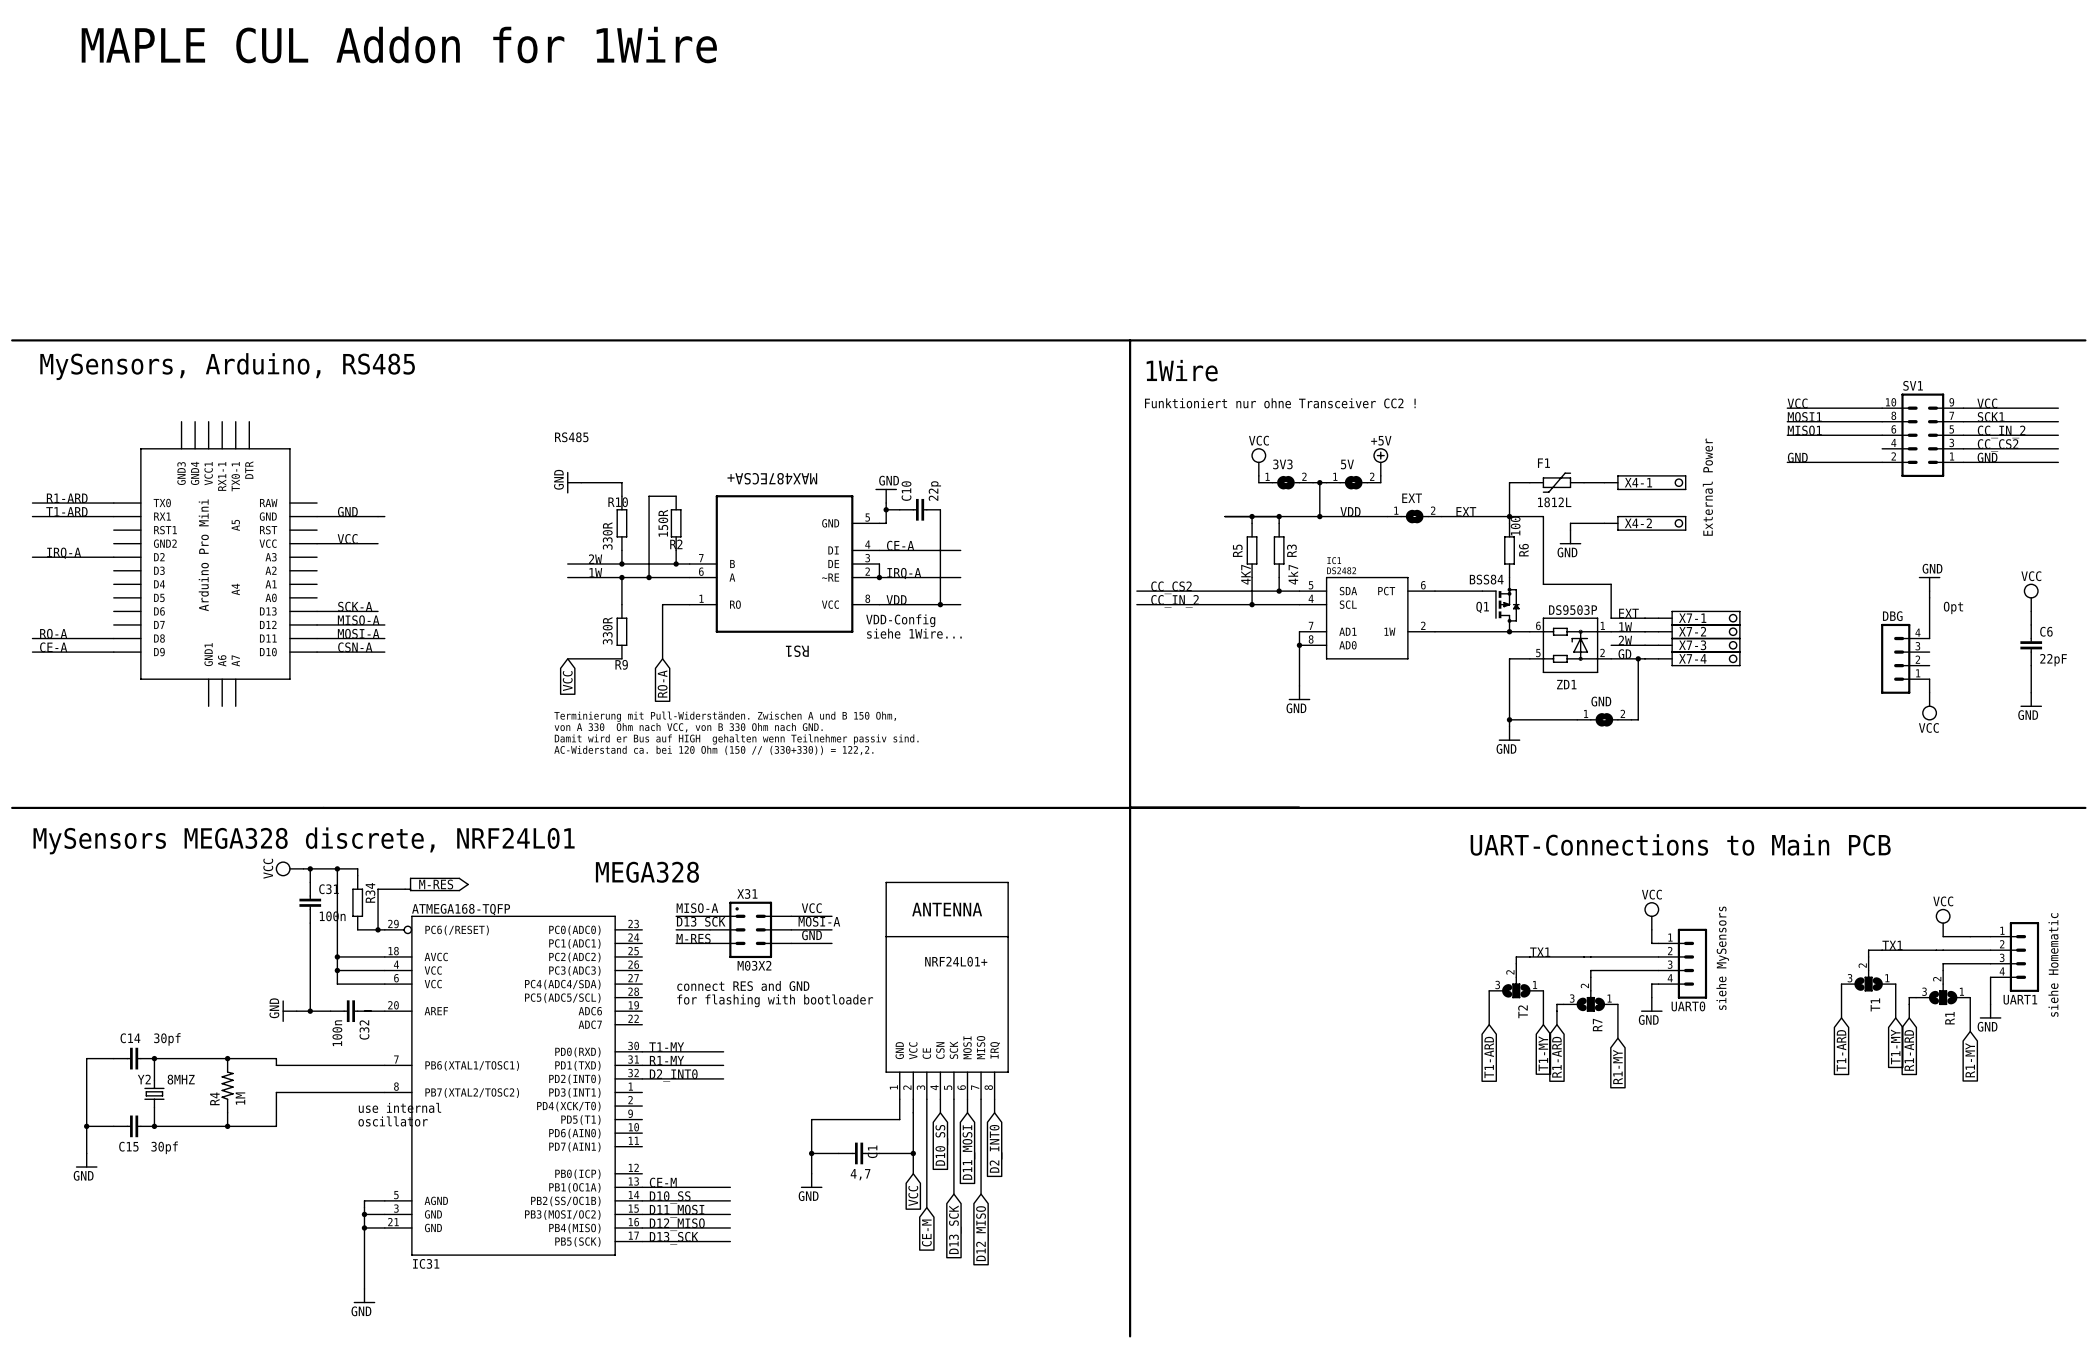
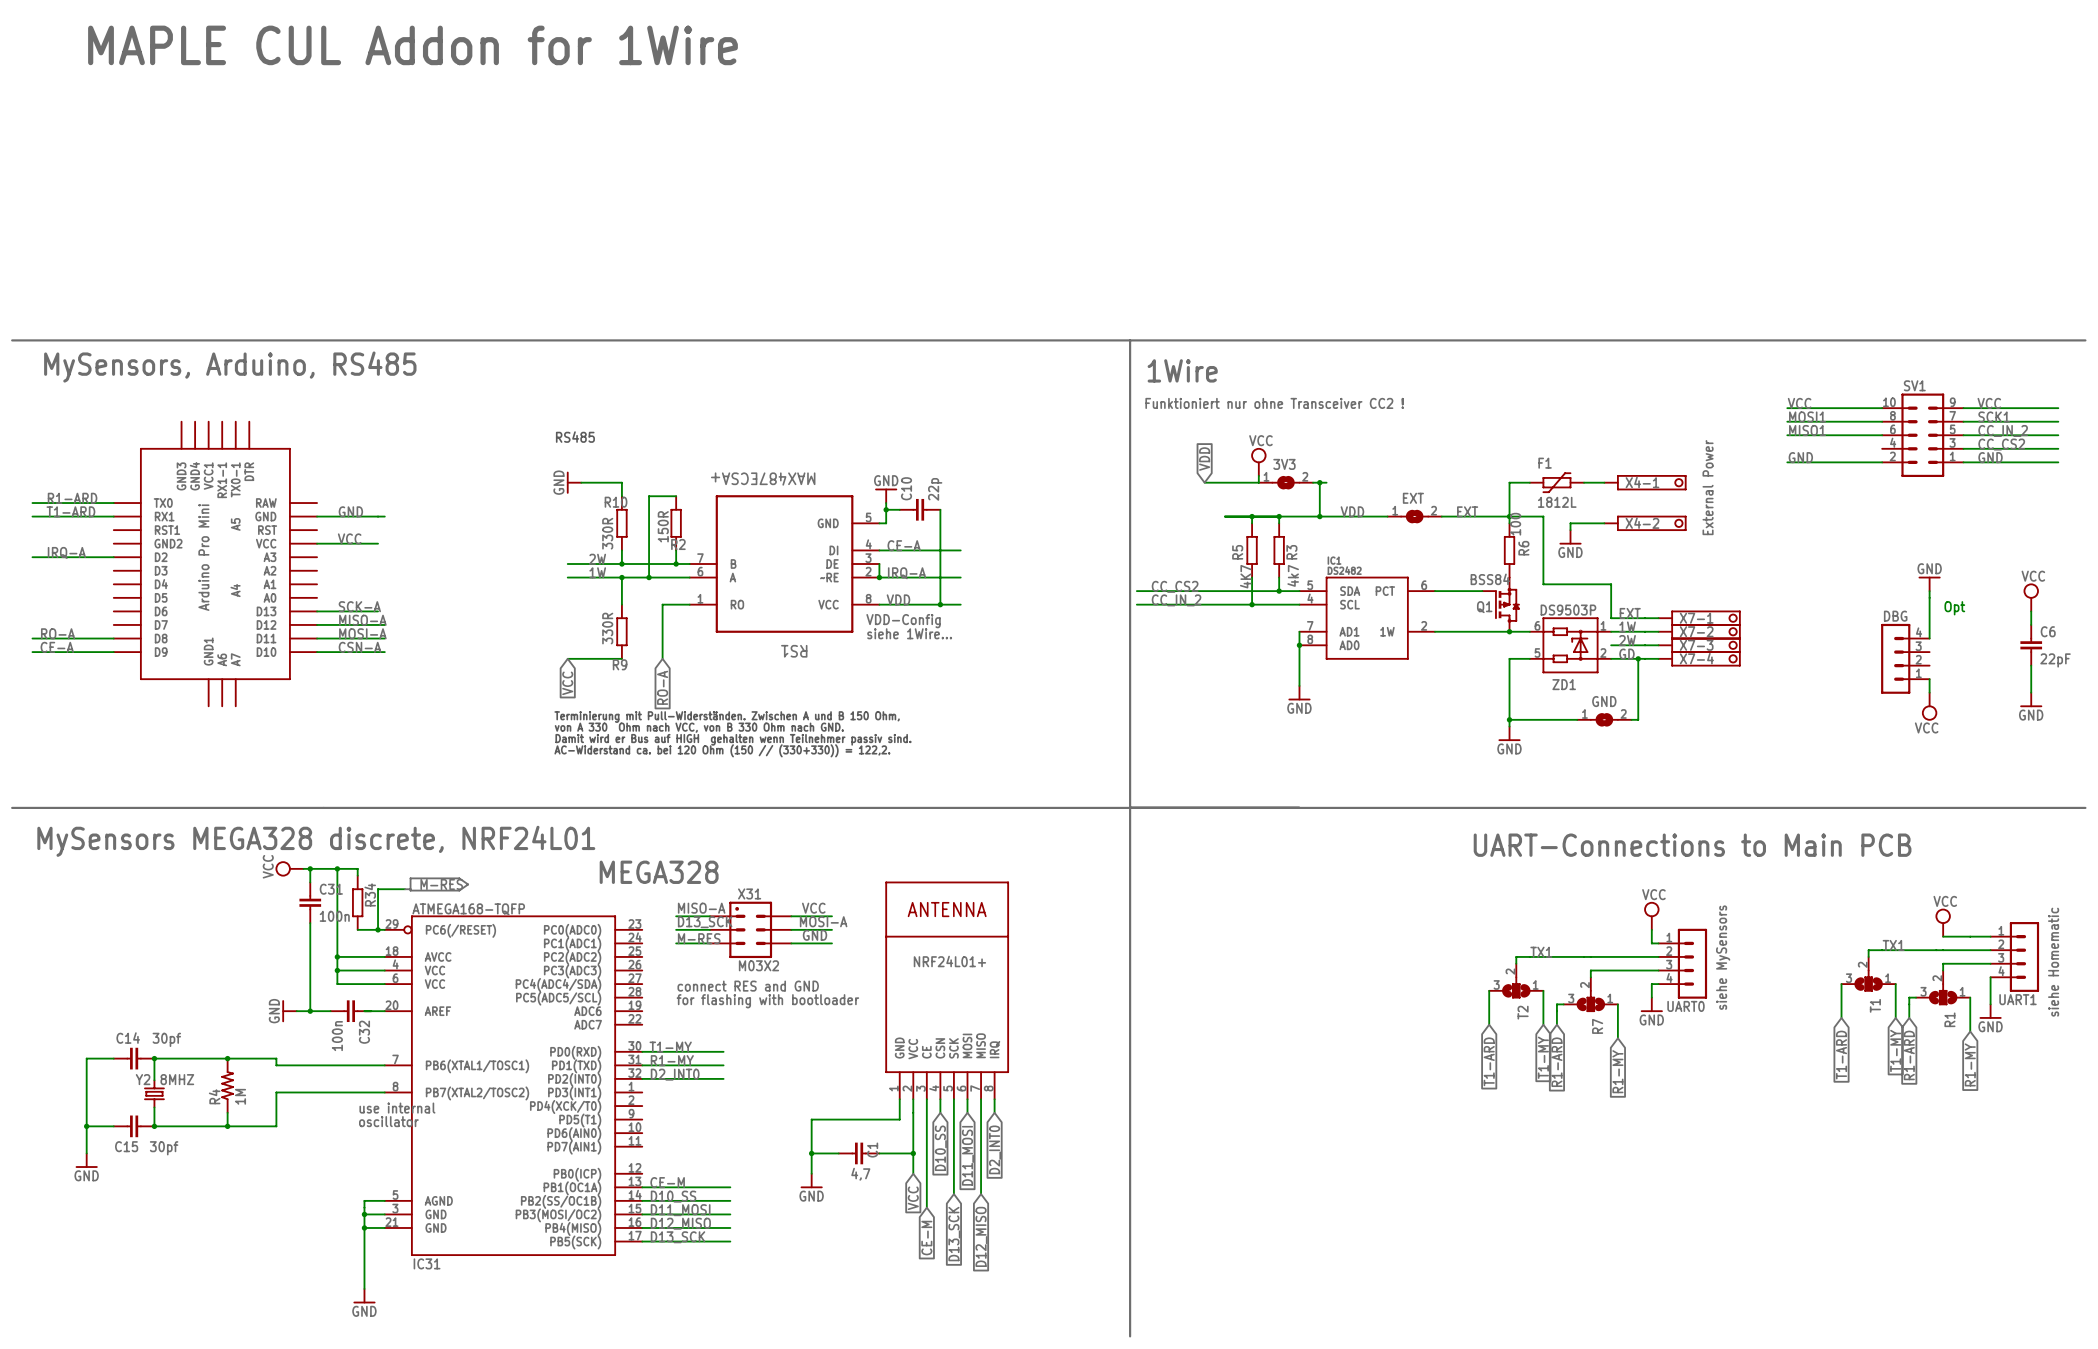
global label: none -> VDD (1204, 459)
power symbol: +5V (1380, 462) -> none
wire: (1380, 475) (1380, 482) -> none
wire: none -> (1204, 482) (1258, 482)
5V: (1353, 482) -> none

